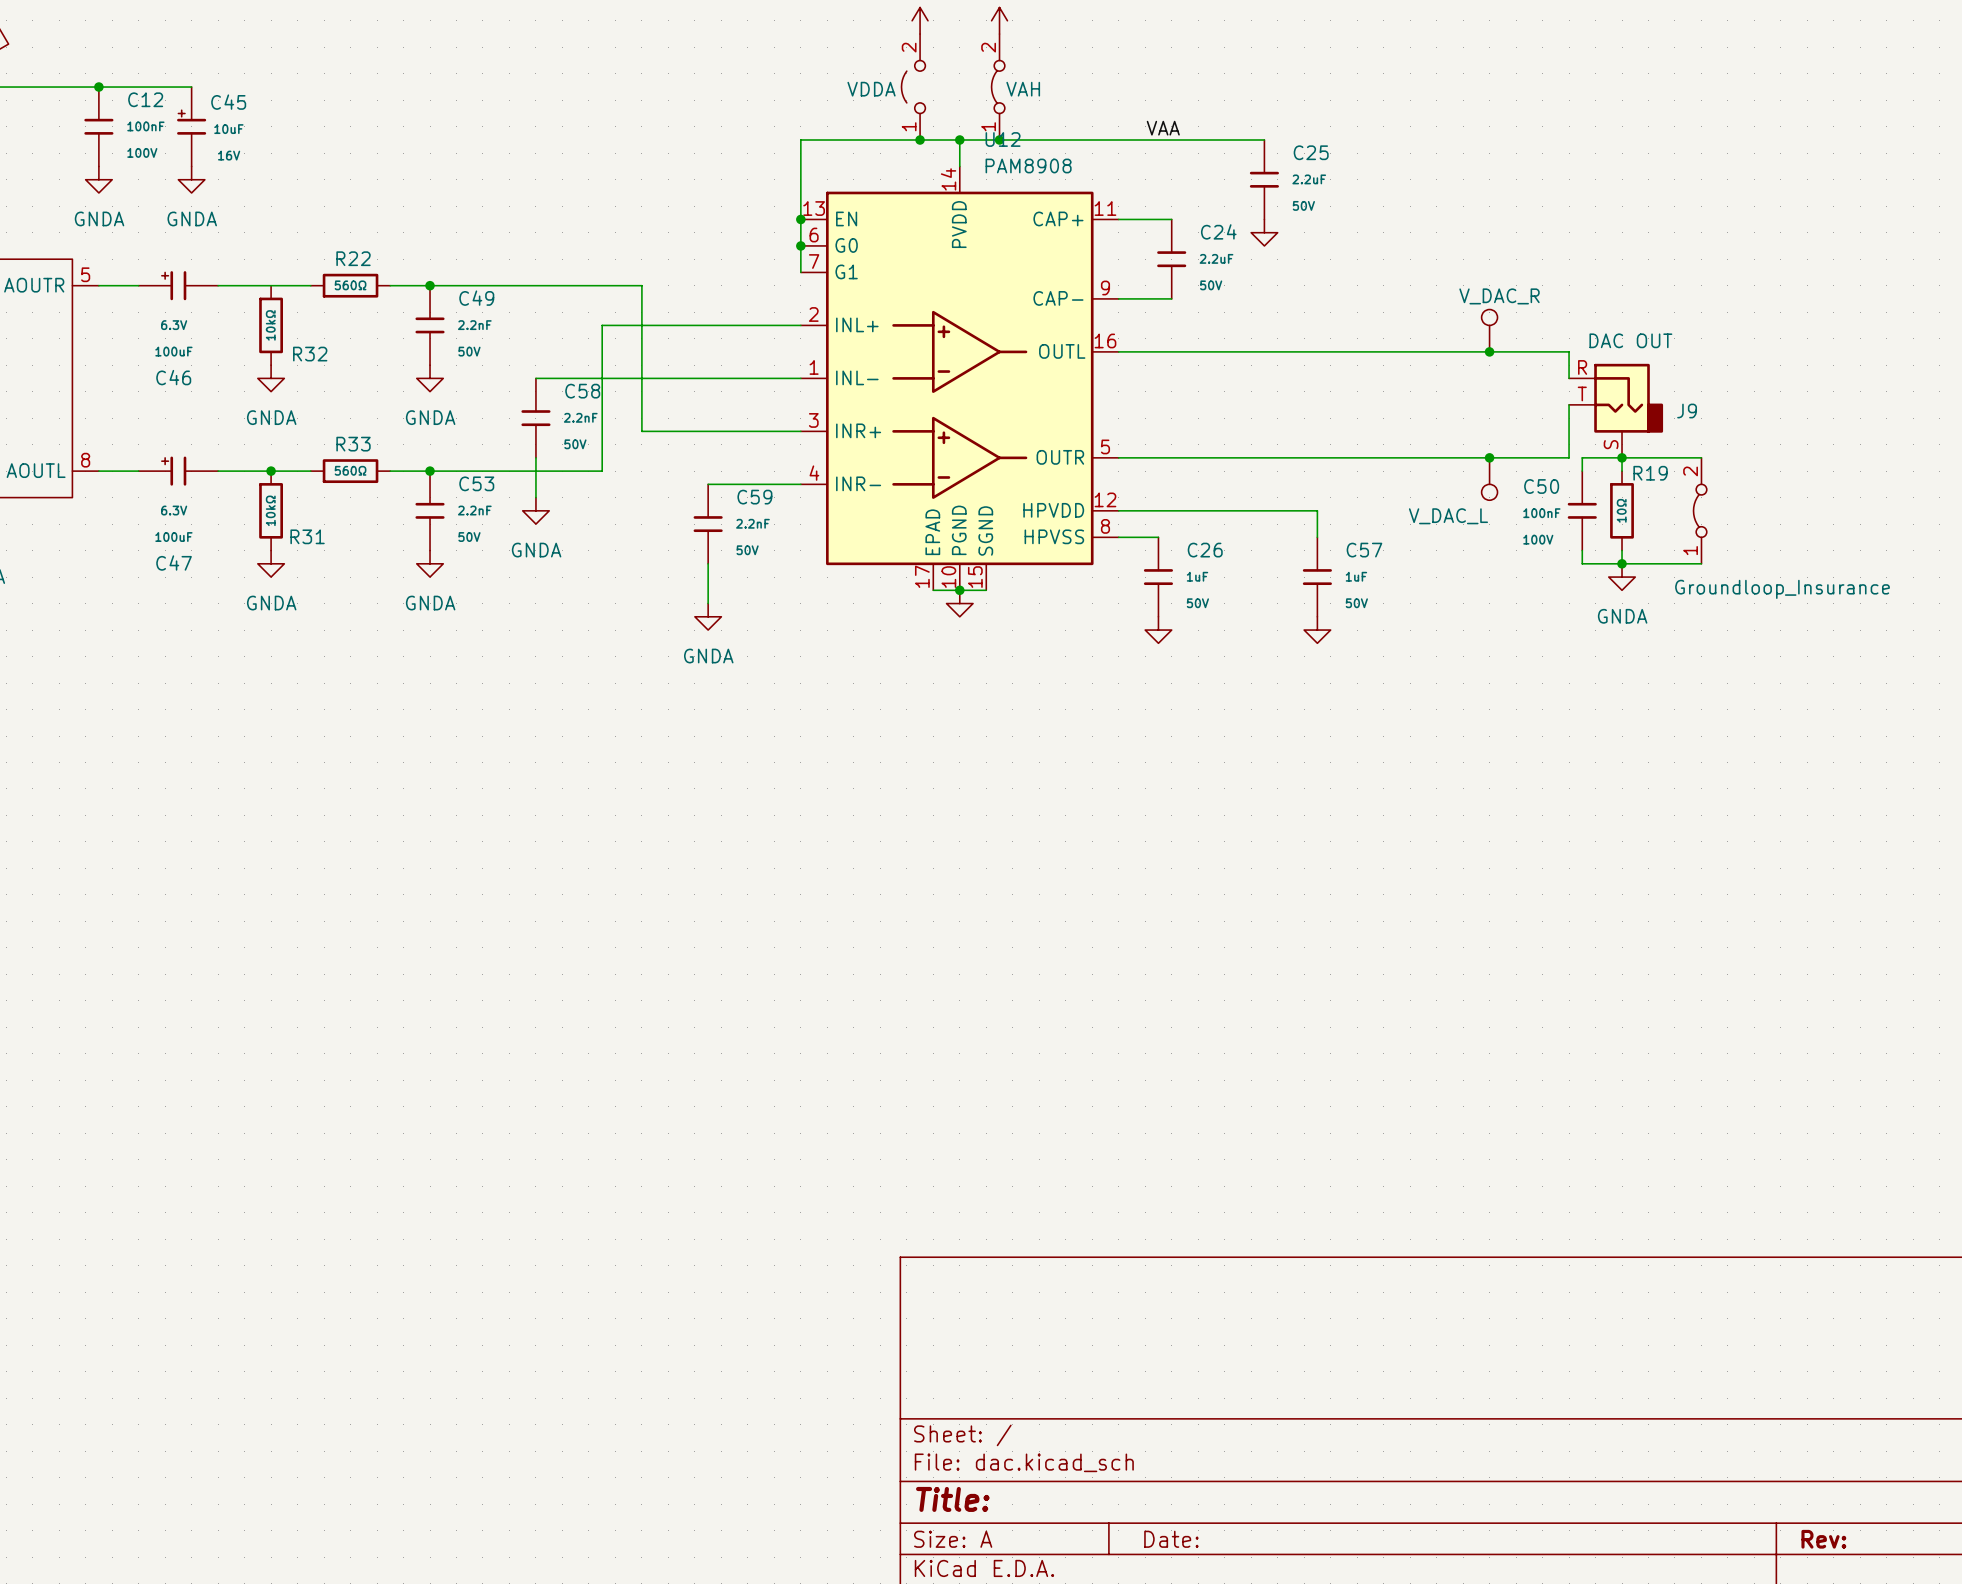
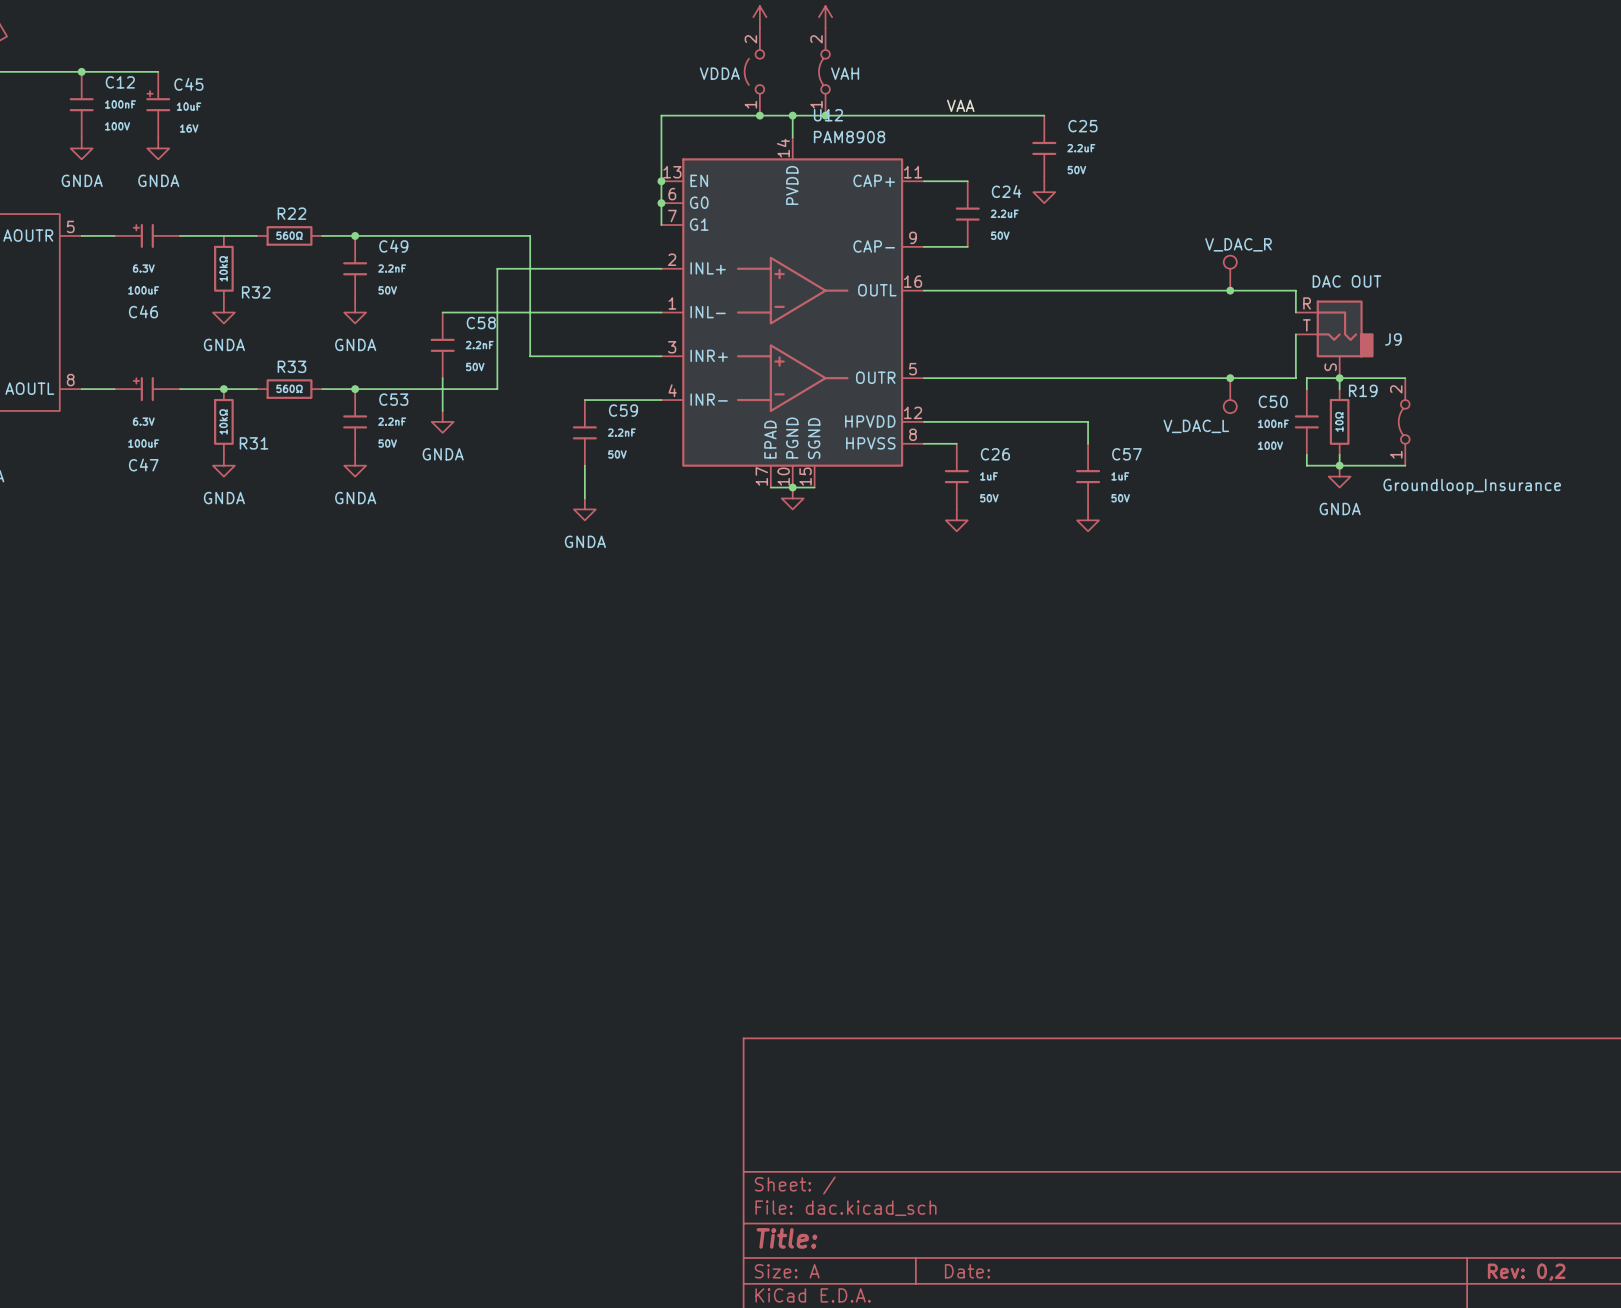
title block: Rev: (1823, 1539) -> Rev: 0,2 (1526, 1272)

